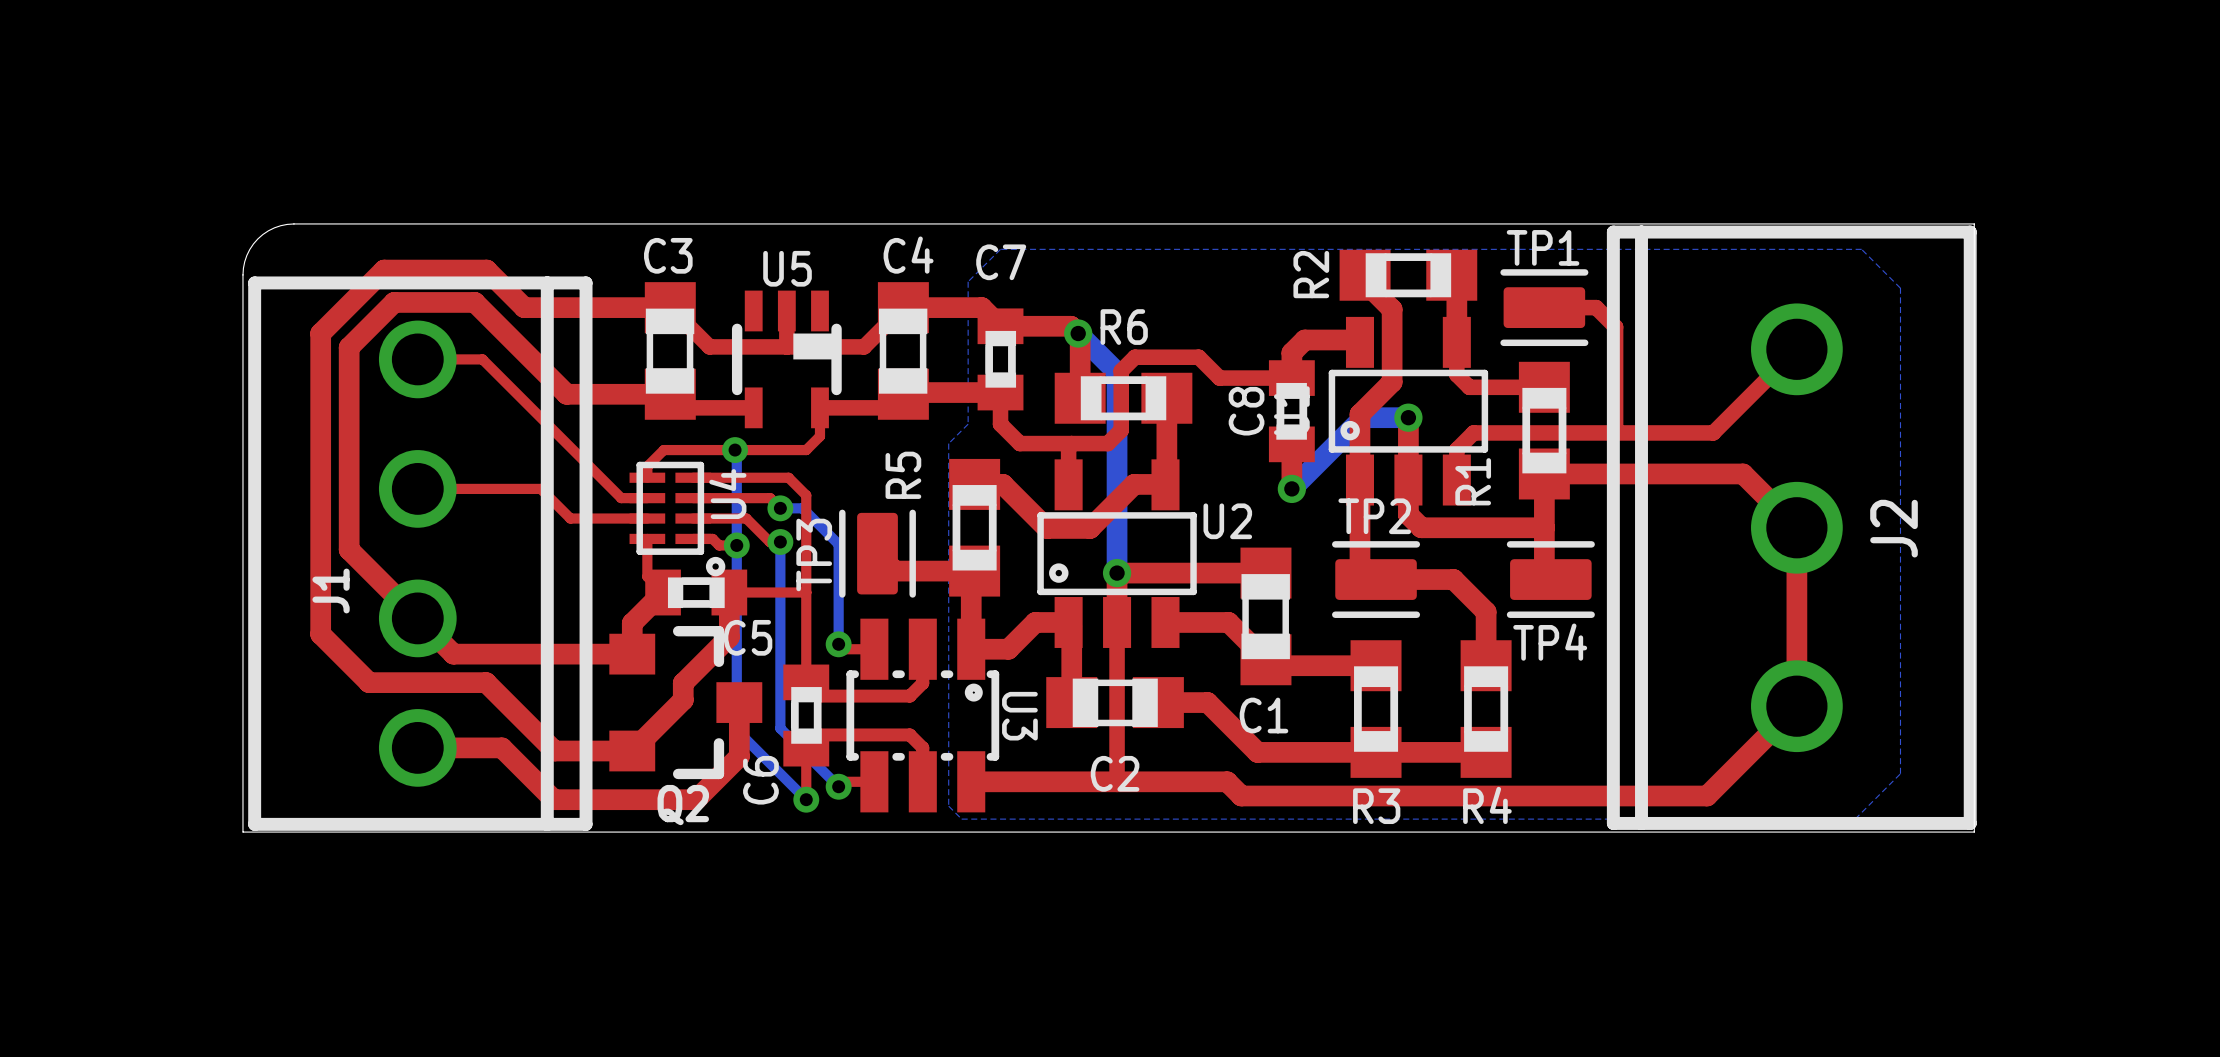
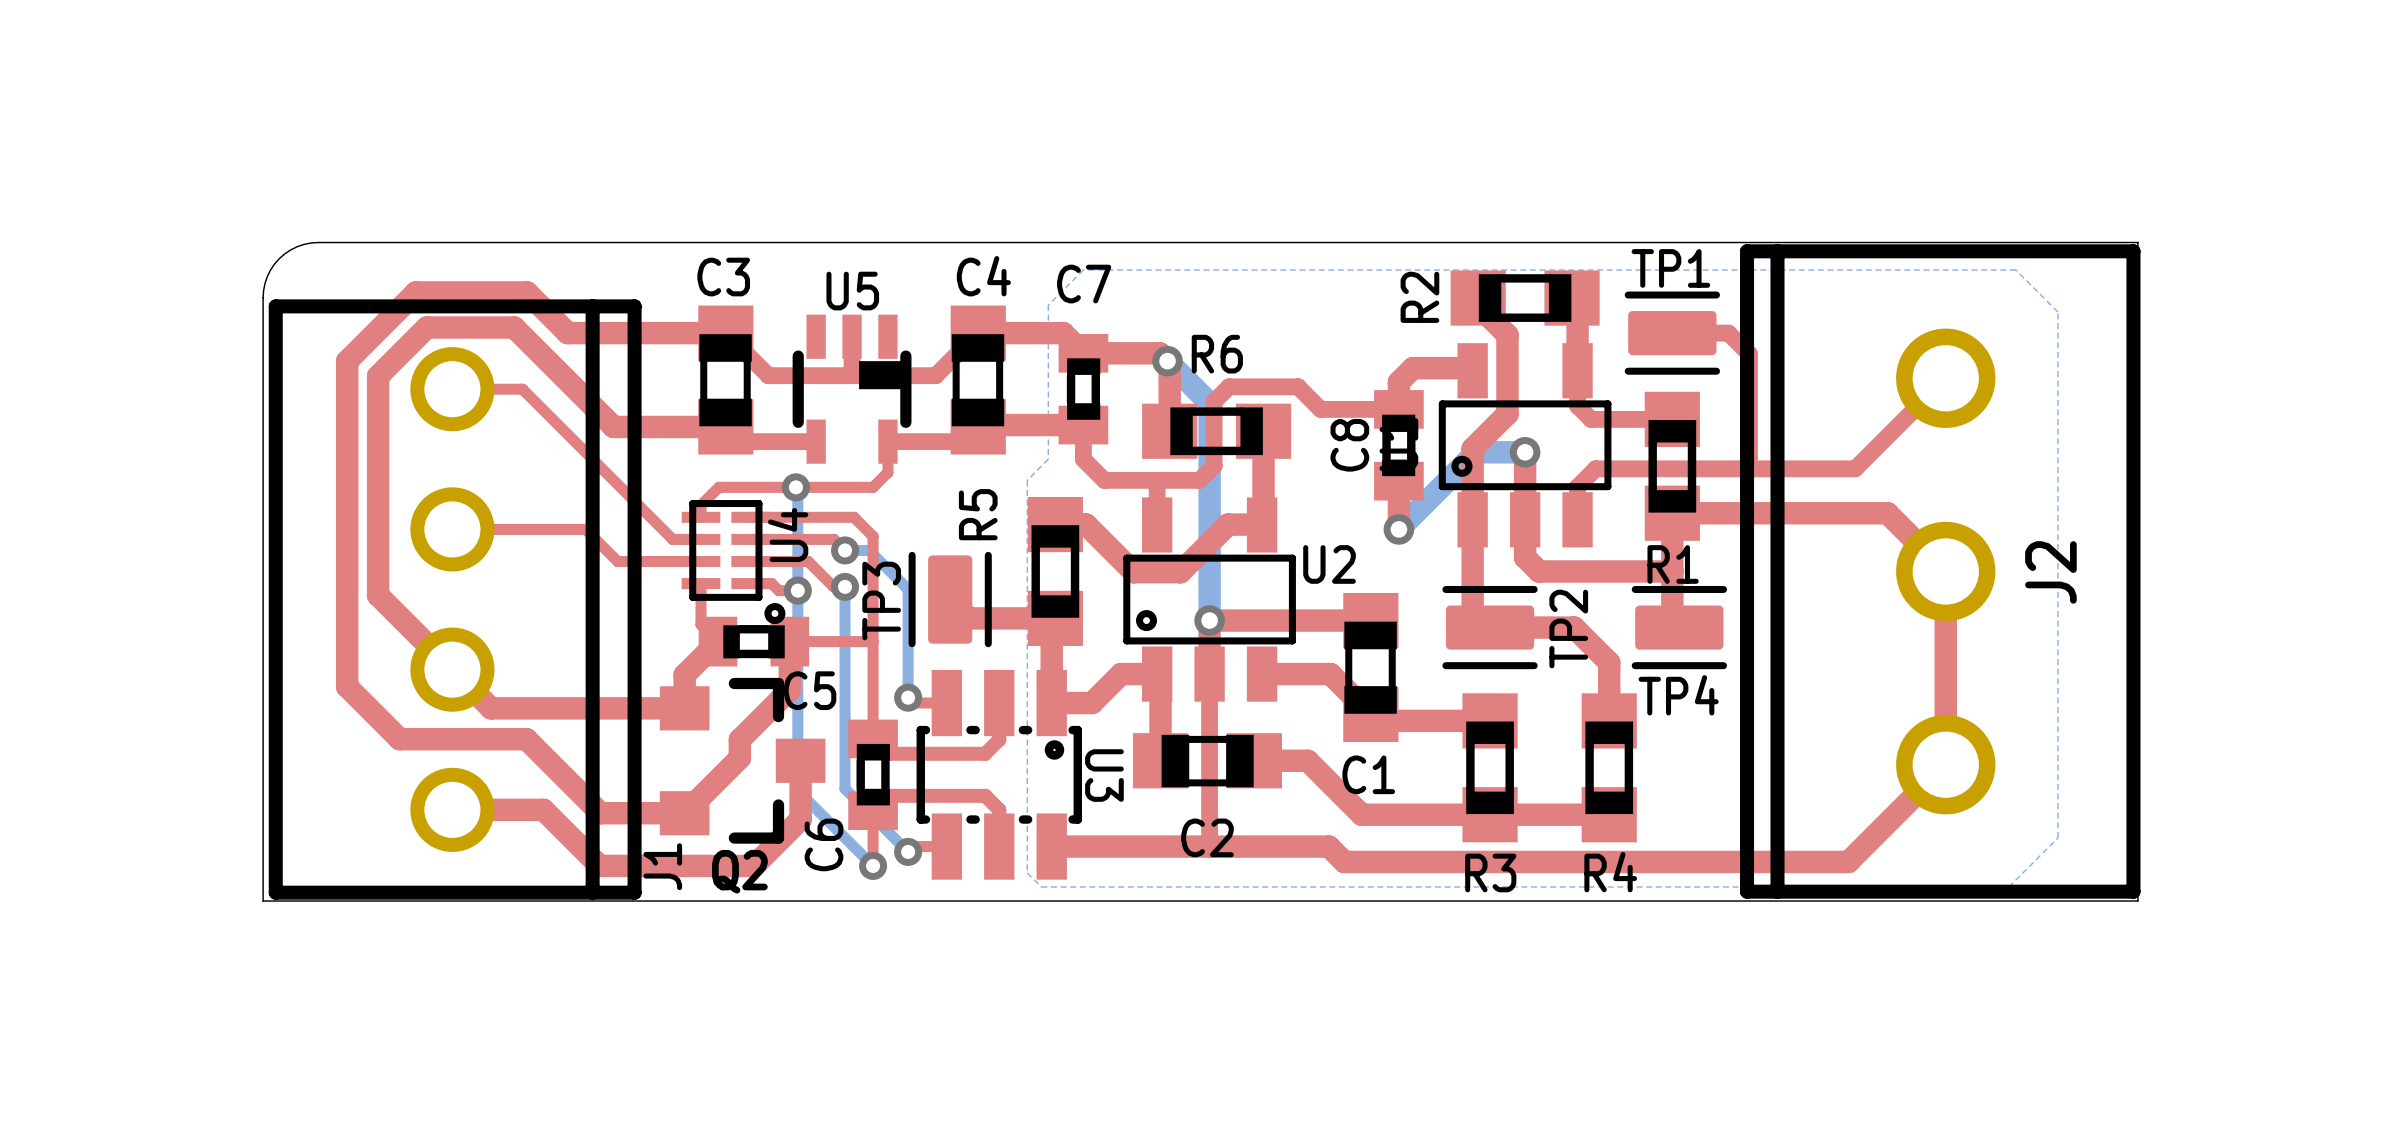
R1 name rotation: 0° (1473, 481) -> 90° clockwise (1673, 564)
R1 name position: R1 (1473, 481) -> R1 (1673, 564)
TP2 name rotation: 0° (1374, 516) -> 90° counterclockwise (1568, 629)
TP2 name position: TP2 (1374, 516) -> TP2 (1568, 629)
J1 name position: J1 (331, 591) -> J1 (662, 866)

